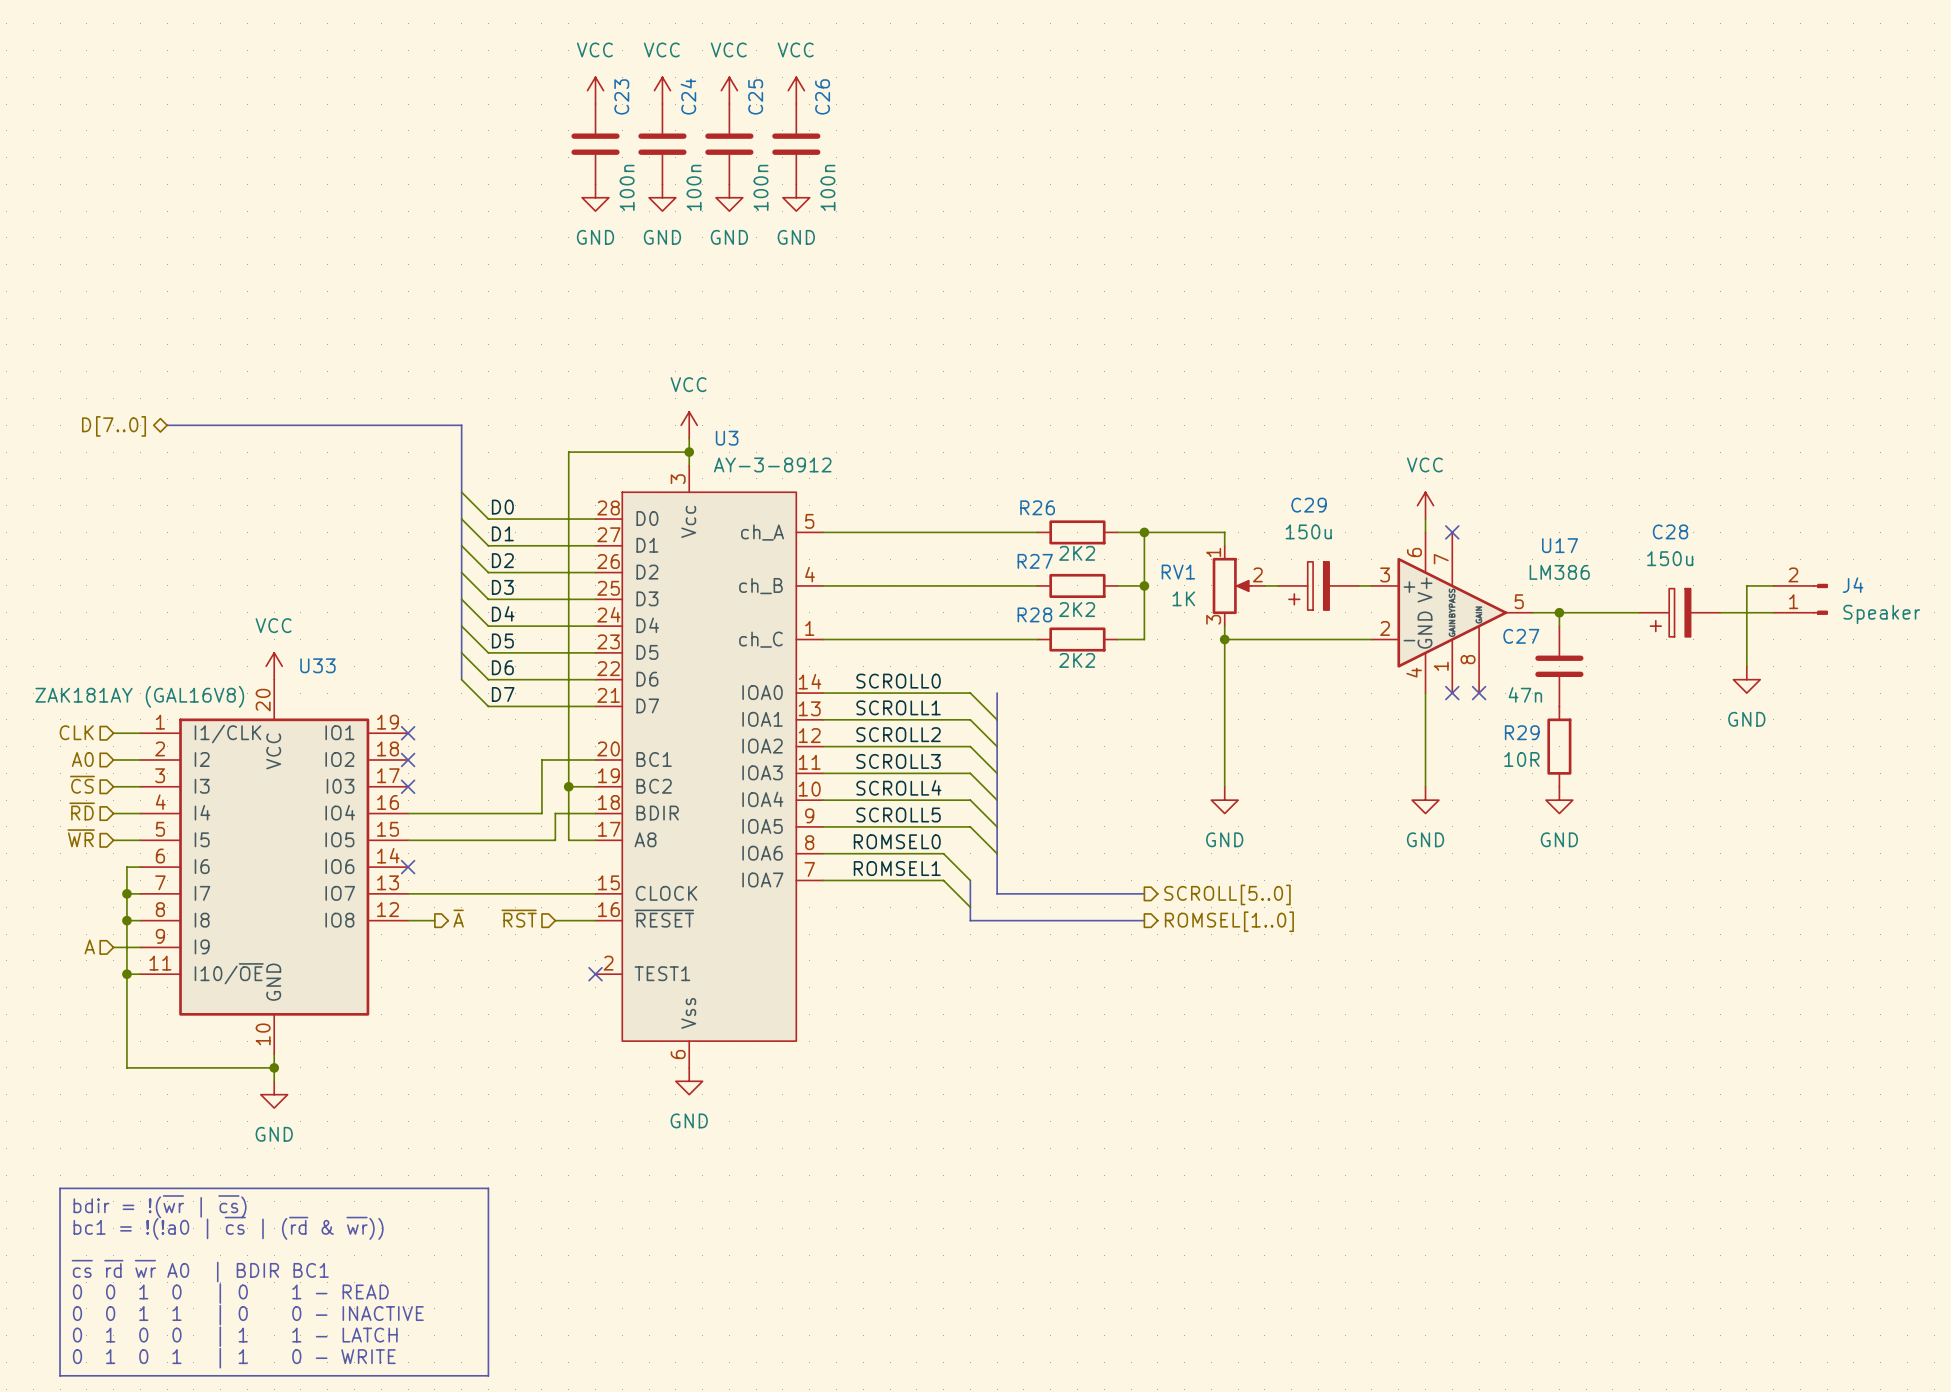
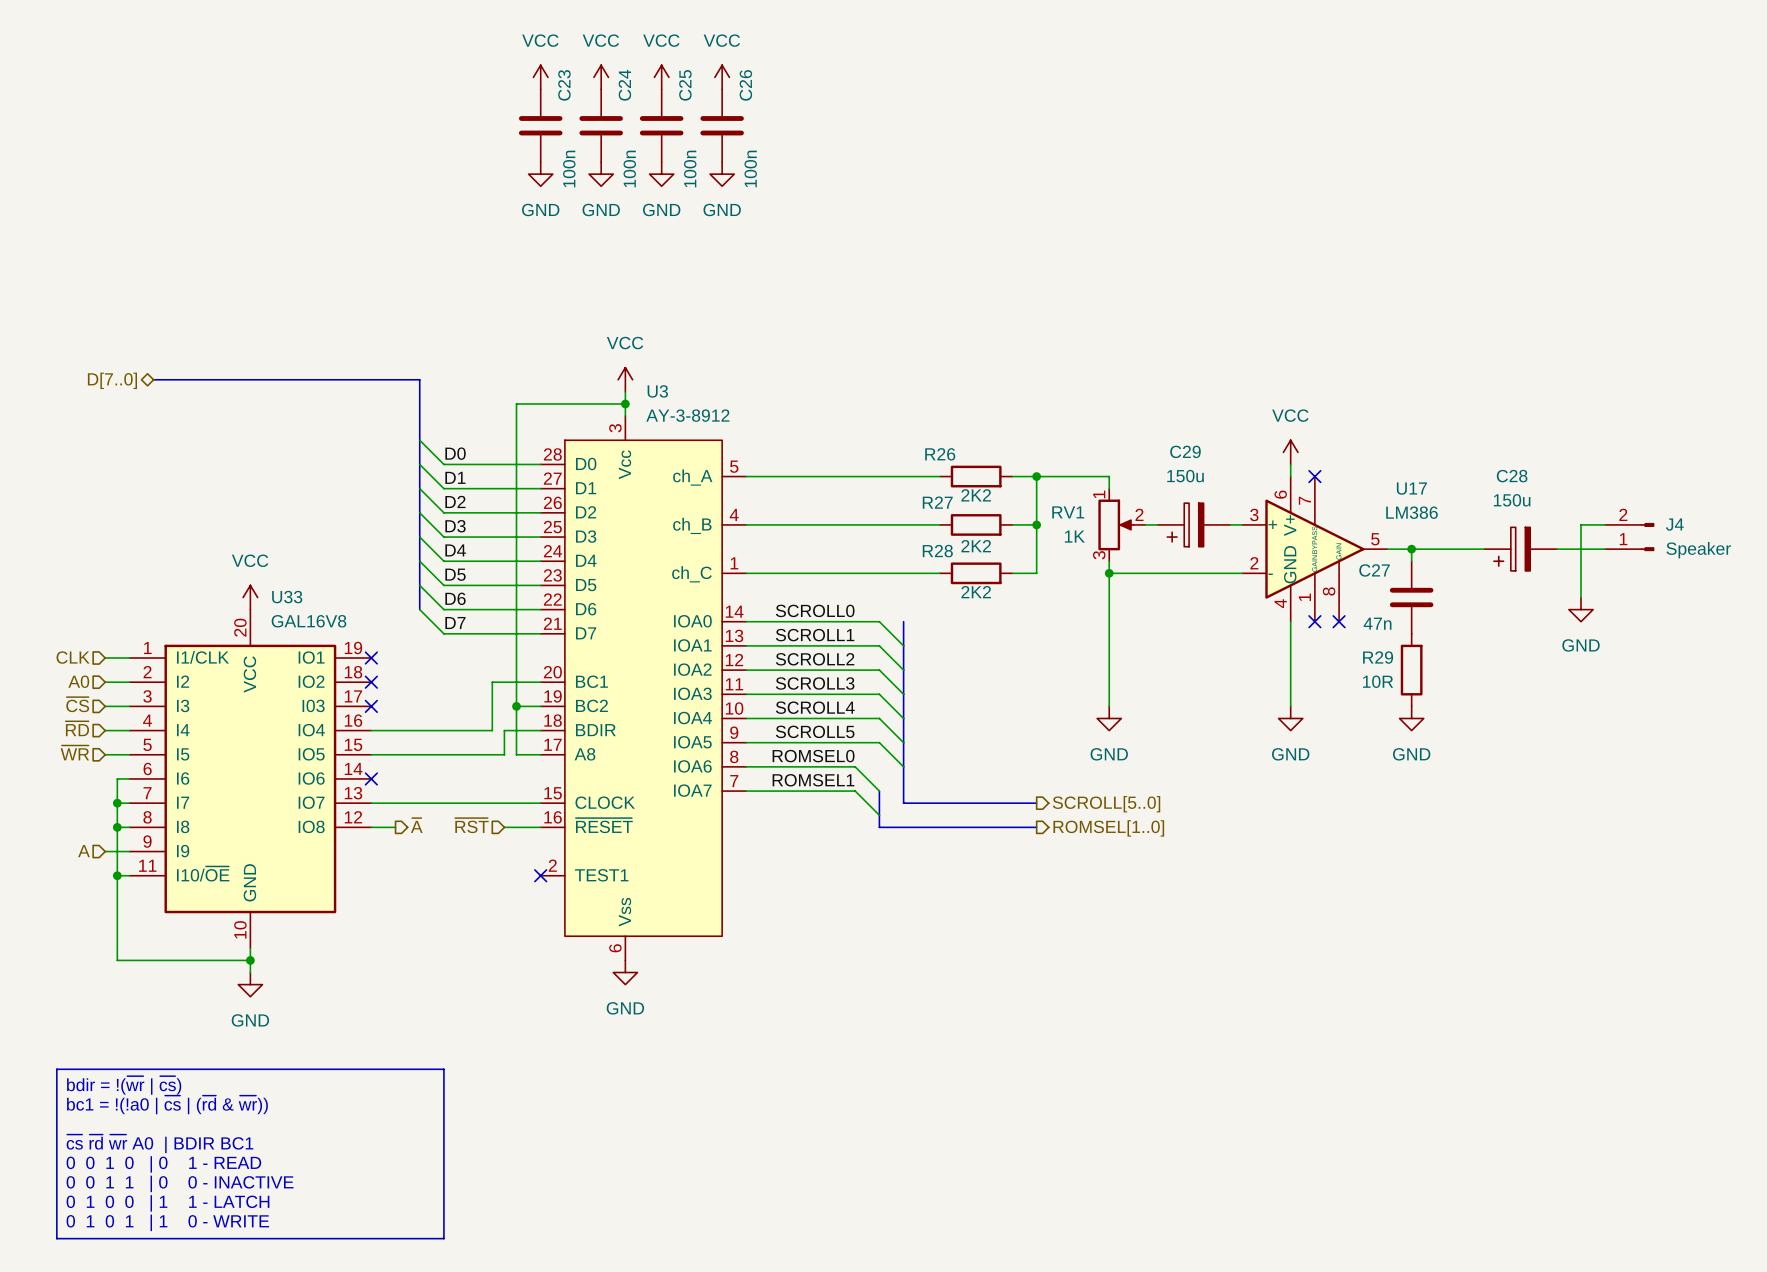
U33 value: ZAK181AY (GAL16V8) (139, 696) -> GAL16V8 (308, 621)

